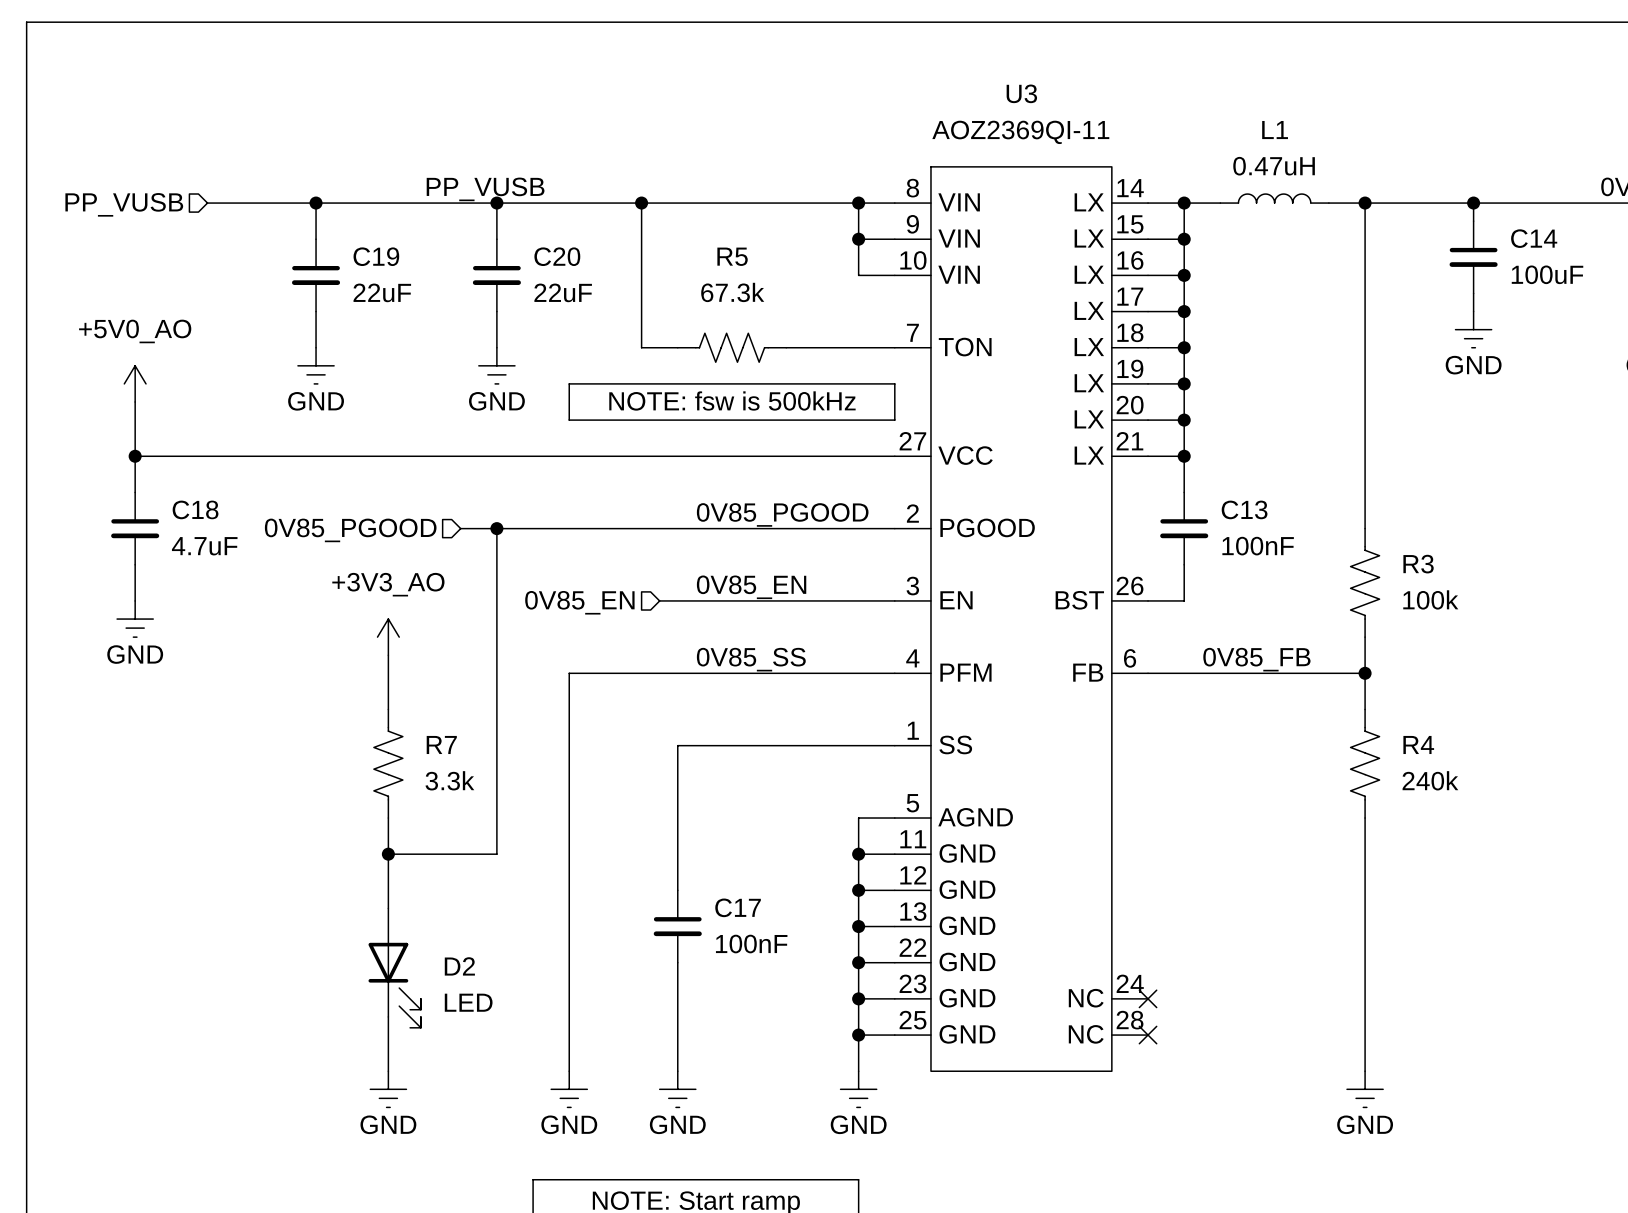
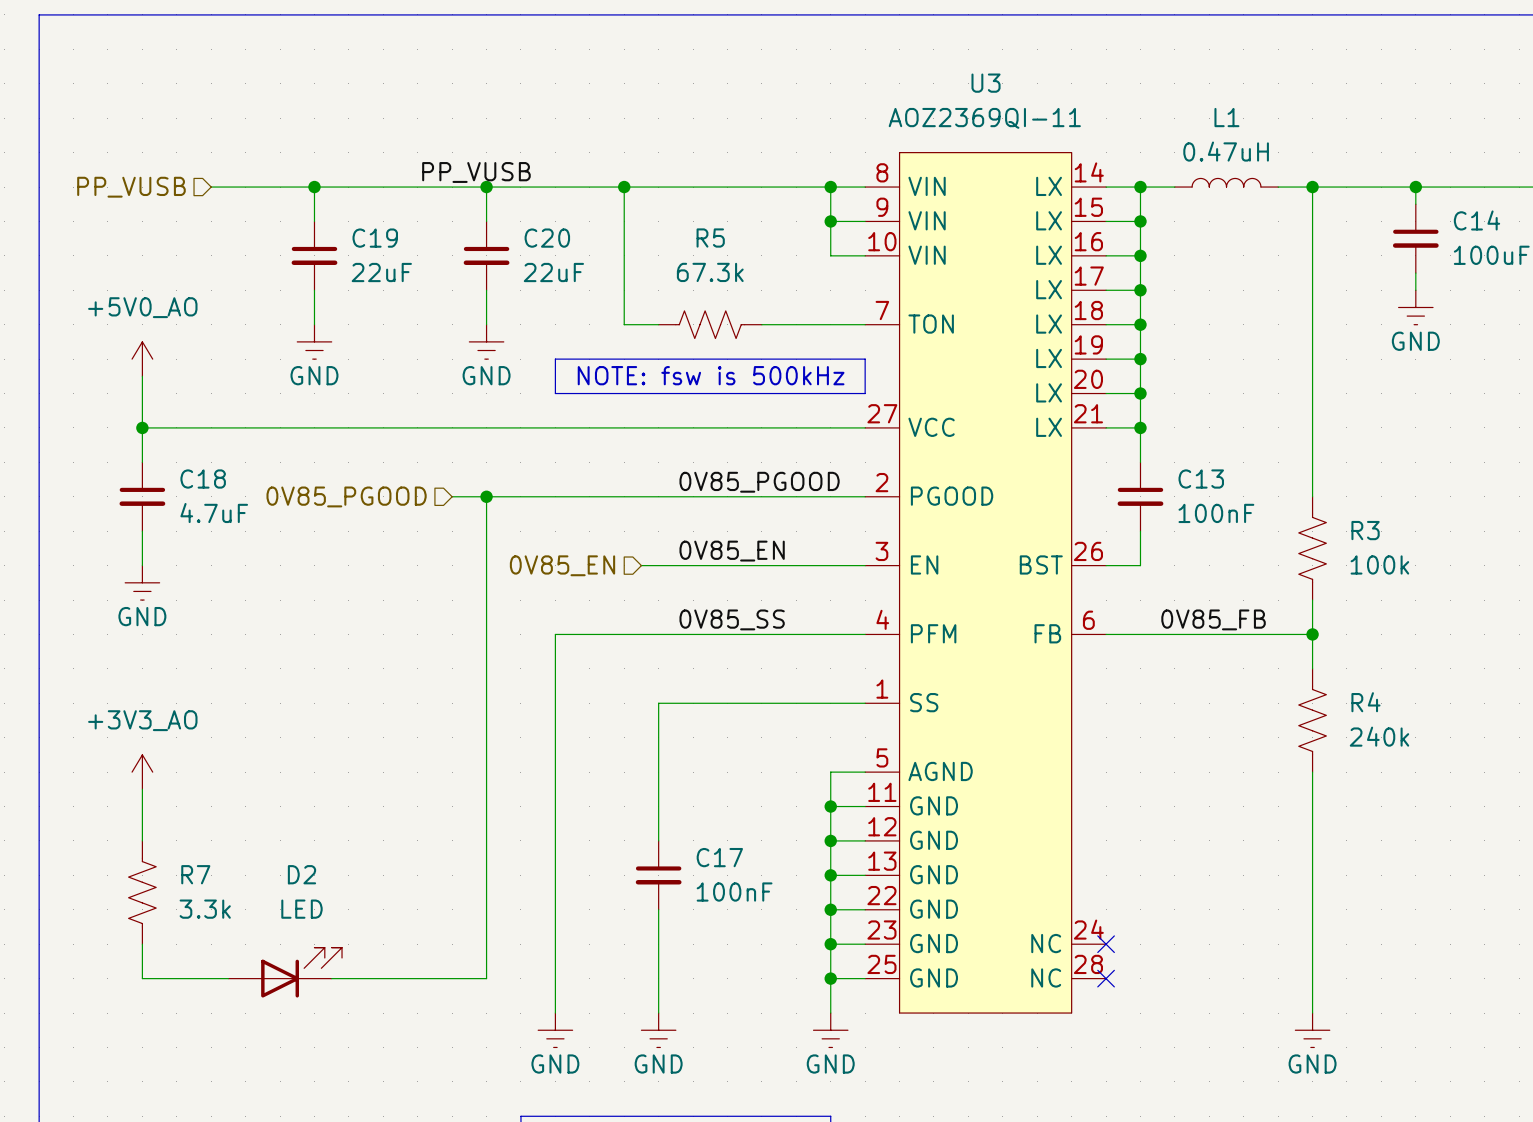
power symbol position: +3V3_AO (388, 637) -> +3V3_AO (142, 772)
wire: (388, 655) (388, 709) -> (142, 789) (142, 840)
R7 position: (388, 763) -> (142, 892)
wire: (388, 818) (388, 908) -> none
wire: (388, 854) (496, 854) -> (331, 978) (486, 978) (486, 806)
junction: (388, 854) -> none
D2 name position: D2 (459, 966) -> D2 (301, 874)
D2 position: (394, 968) -> (285, 972)
D2 rotation: 0° (394, 985) -> 90° counterclockwise (301, 972)
wire: none -> (142, 944) (142, 978) (228, 978)
wire: (388, 1016) (388, 1071) -> none
power symbol: GND (388, 1089) -> none

